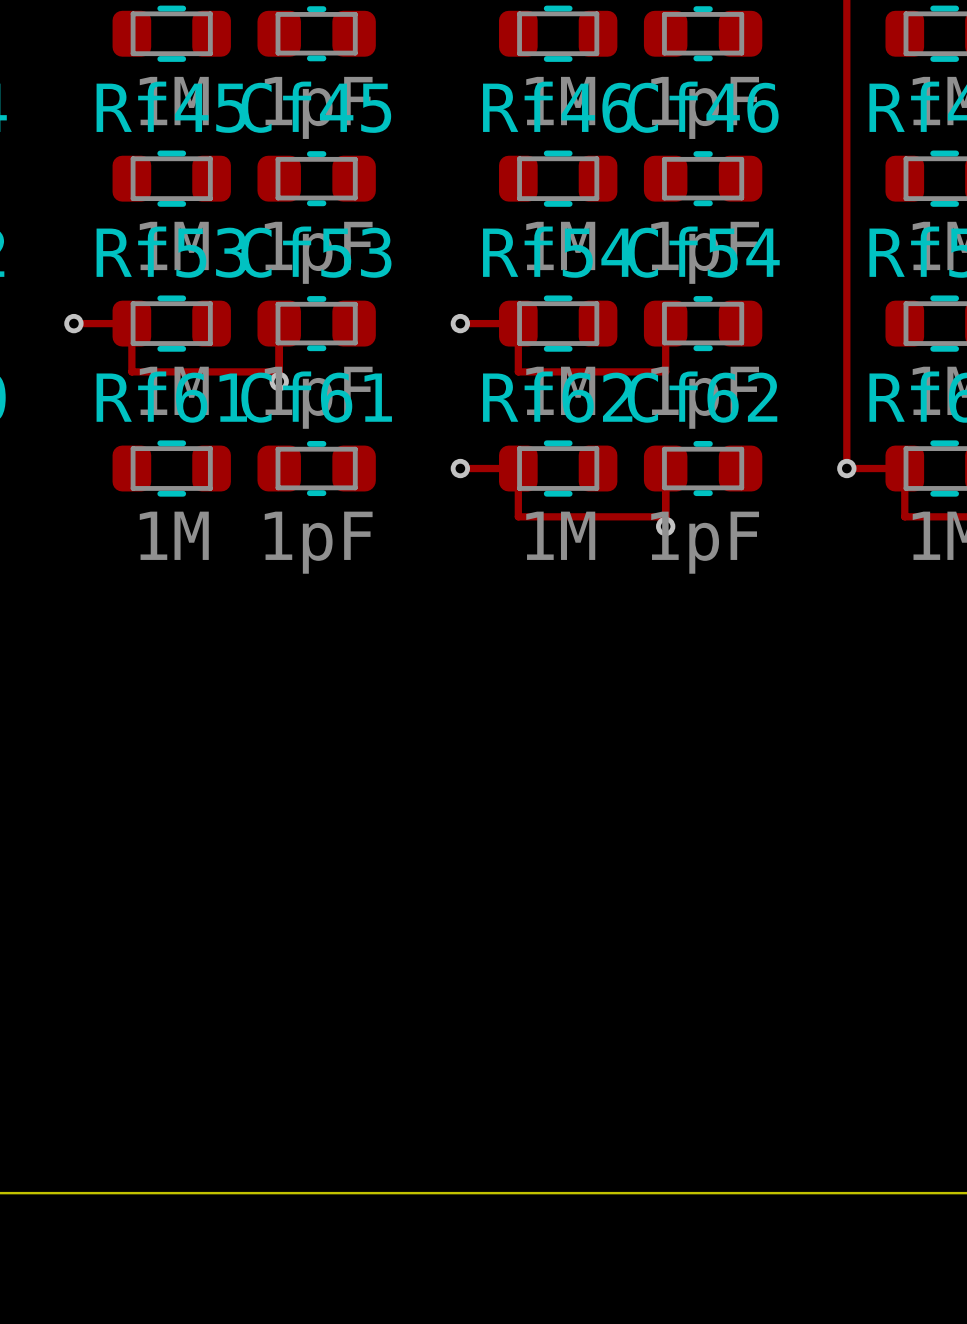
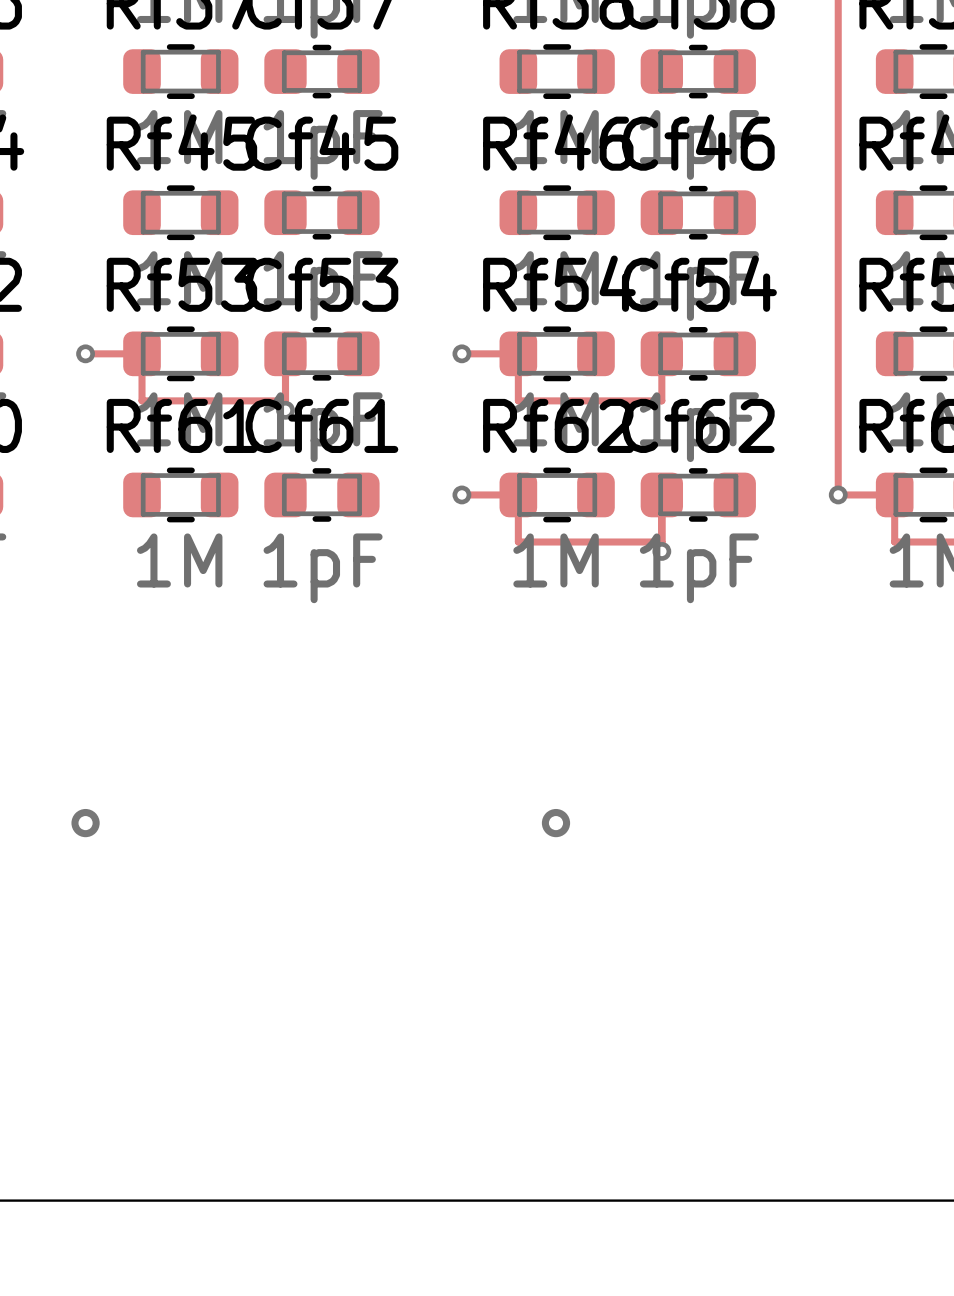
via: none -> (85, 823)
via: none -> (555, 823)

